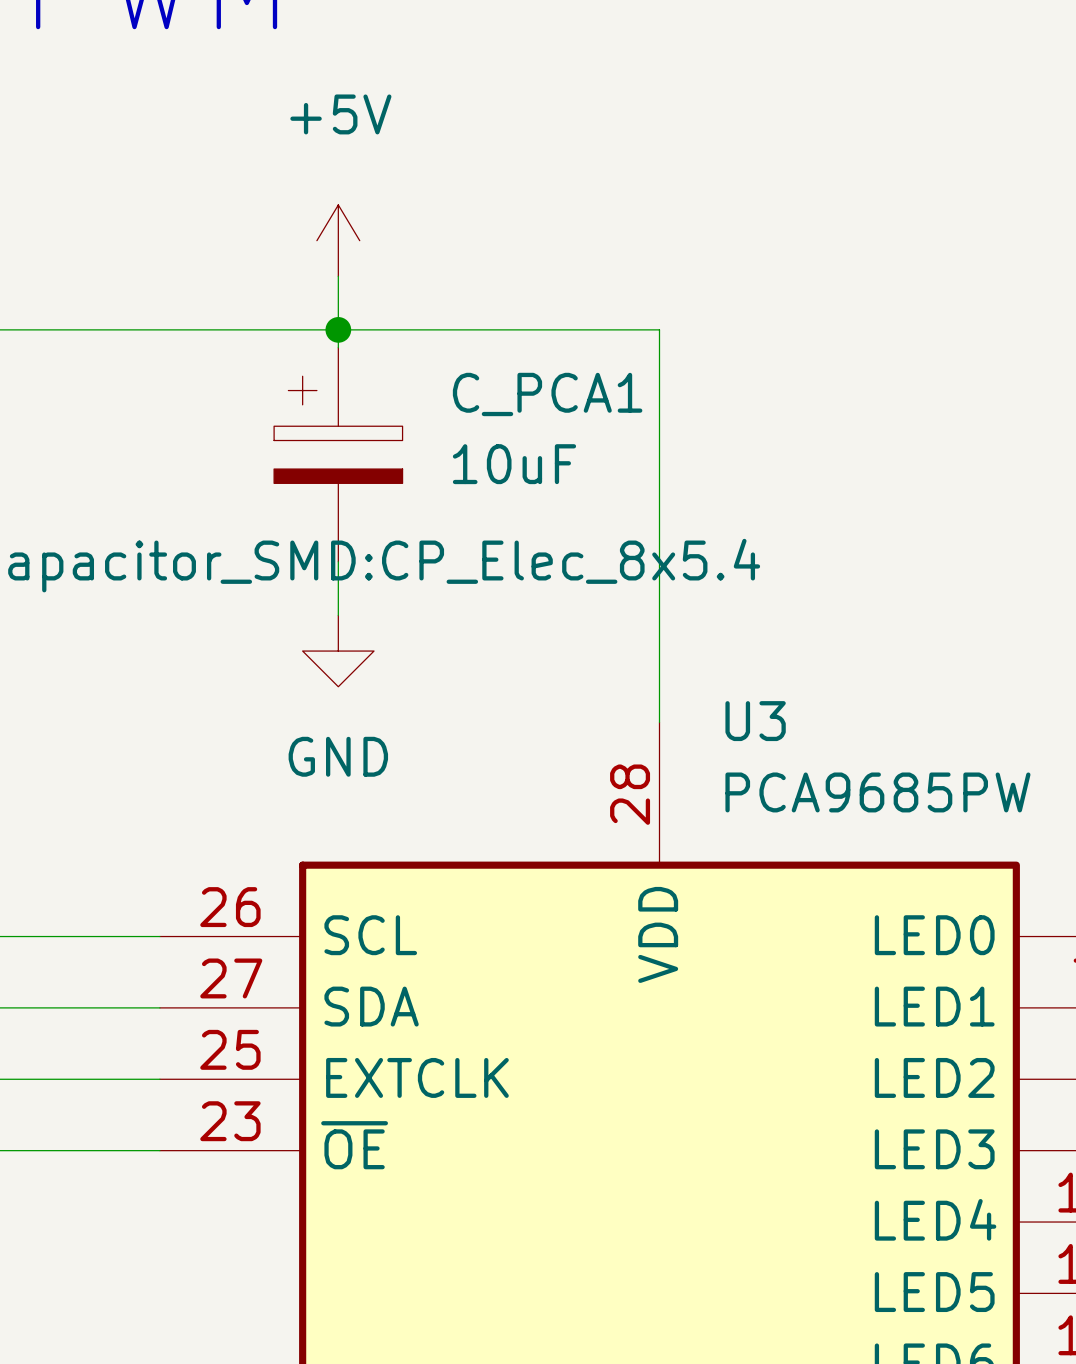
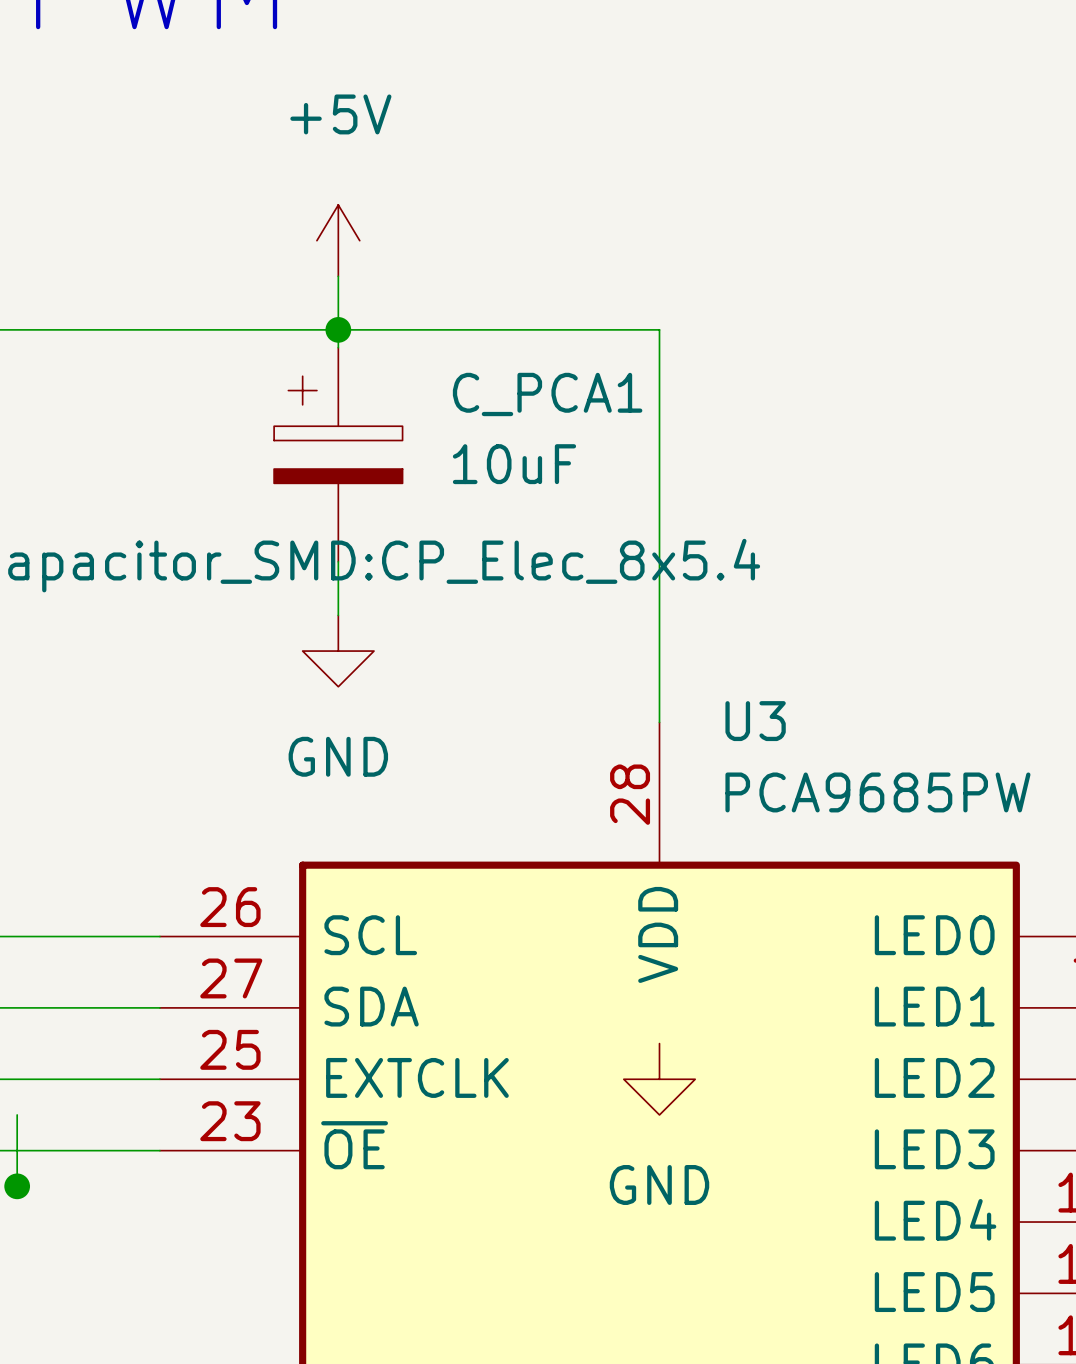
power symbol: none -> GND (659, 1079)
wire: none -> (17, 1114) (17, 1186)
junction: none -> (17, 1186)

